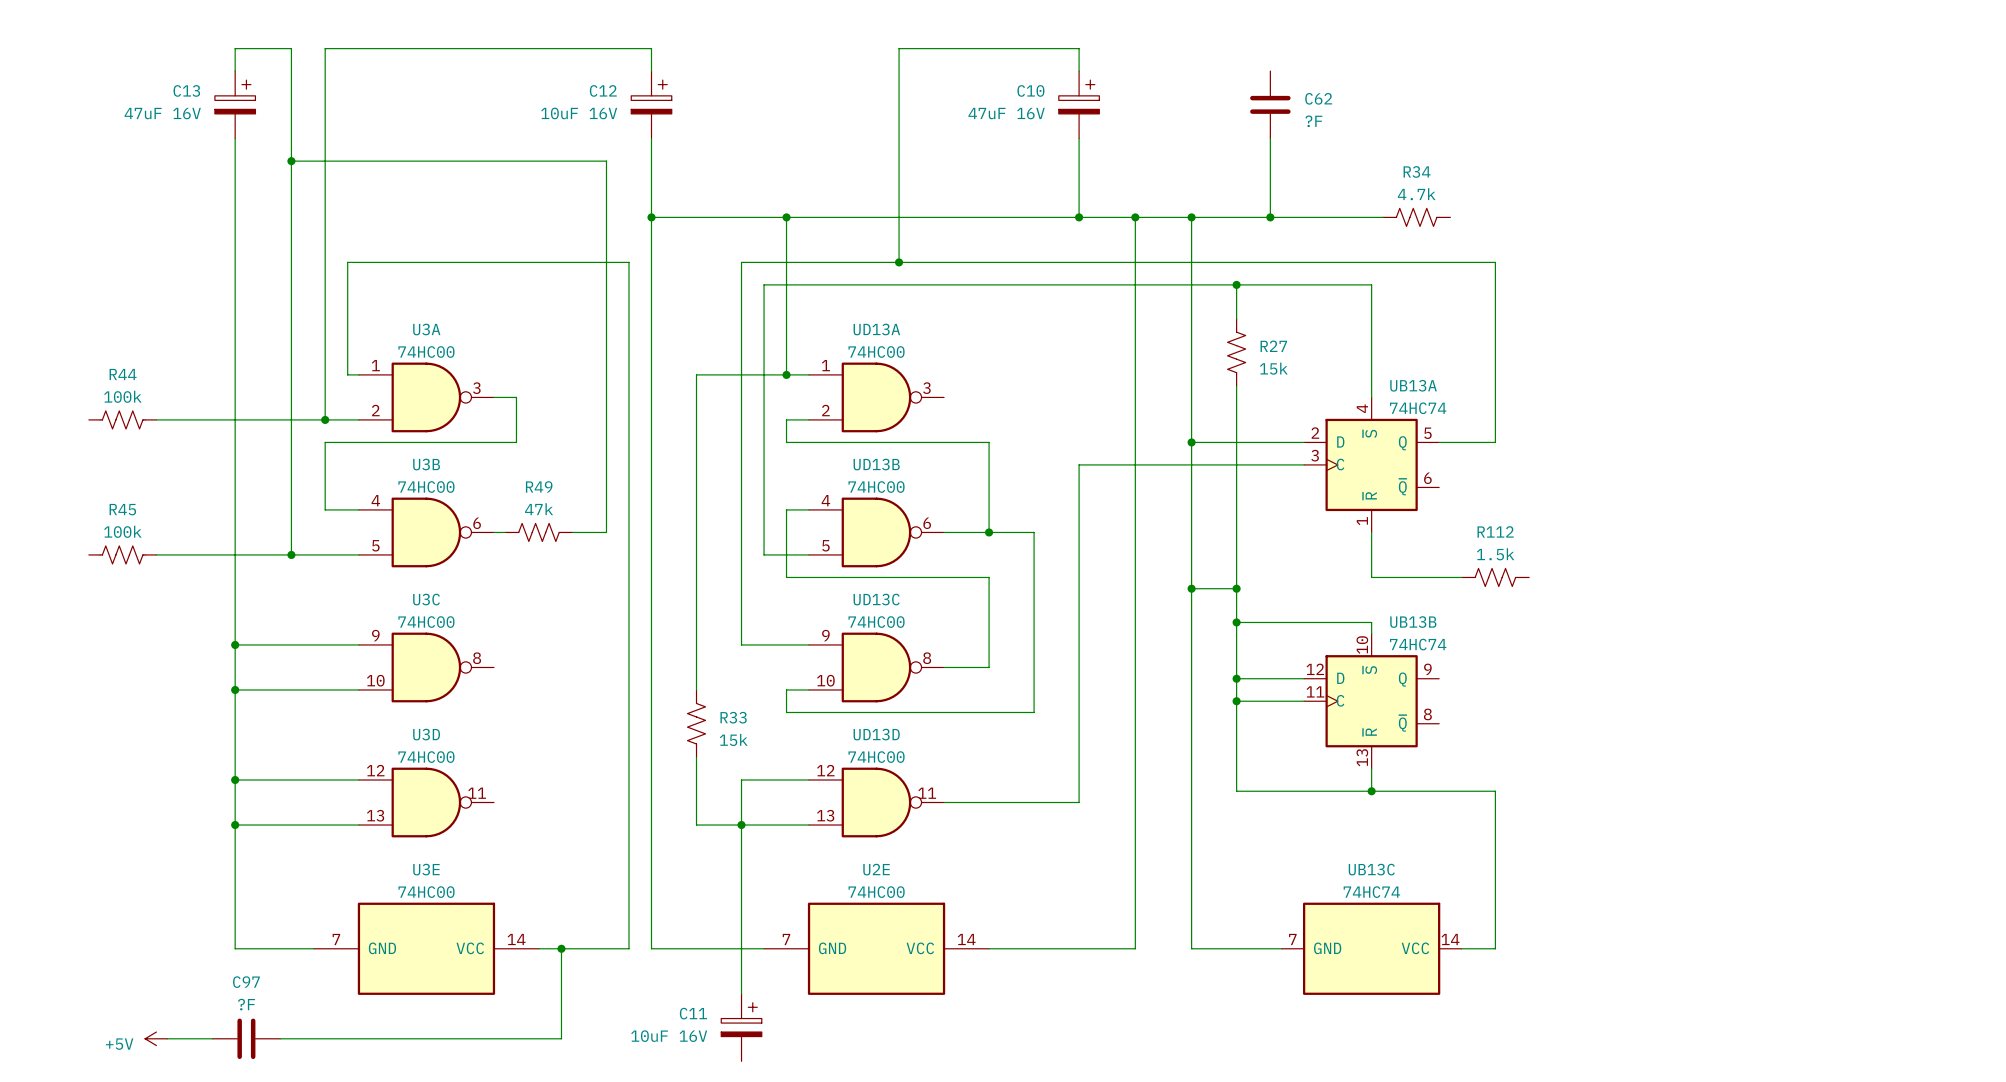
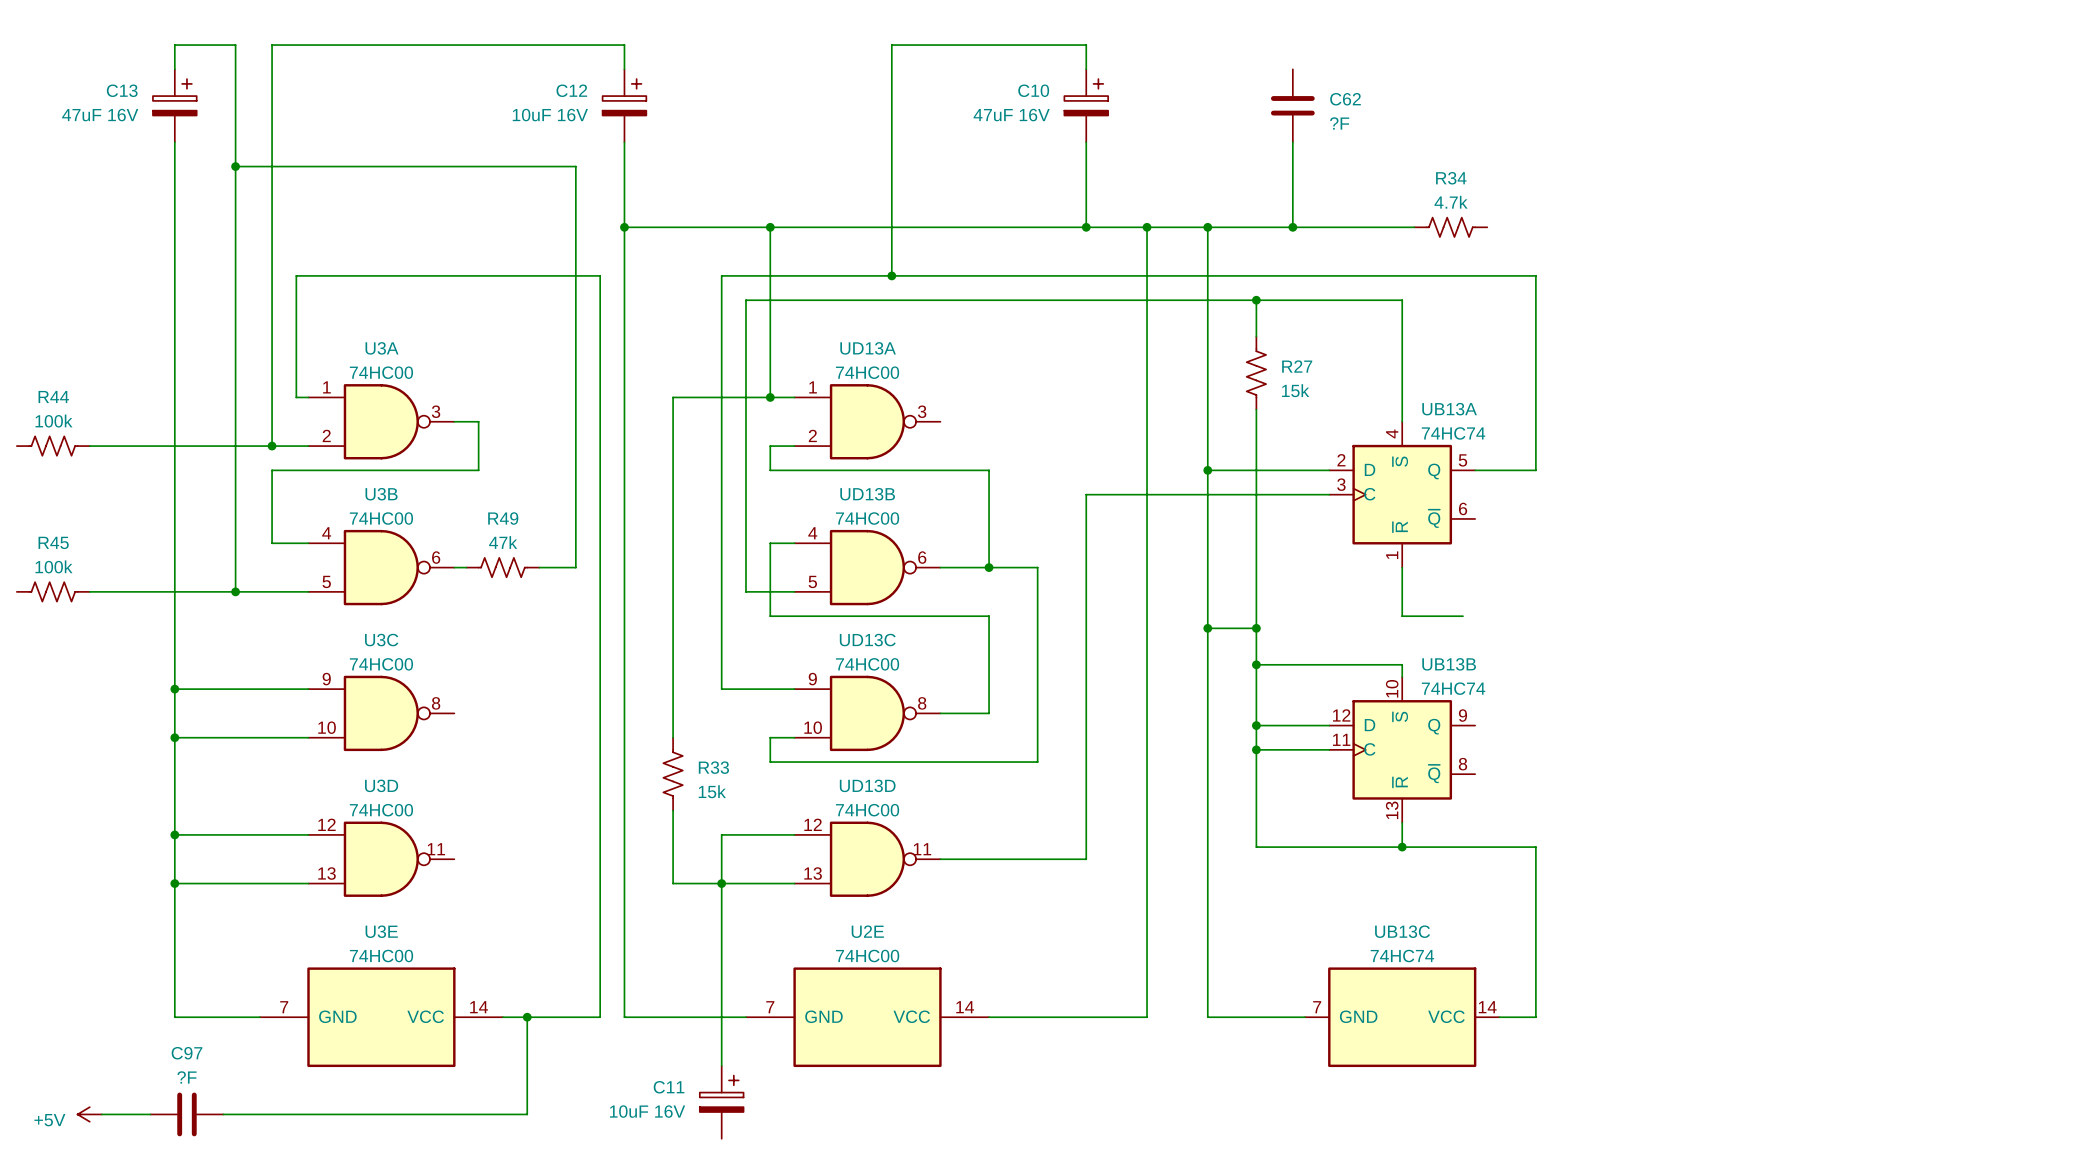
wire: (1427, 577) (1461, 577) -> none
R112: 1.5k (1495, 577) -> none

